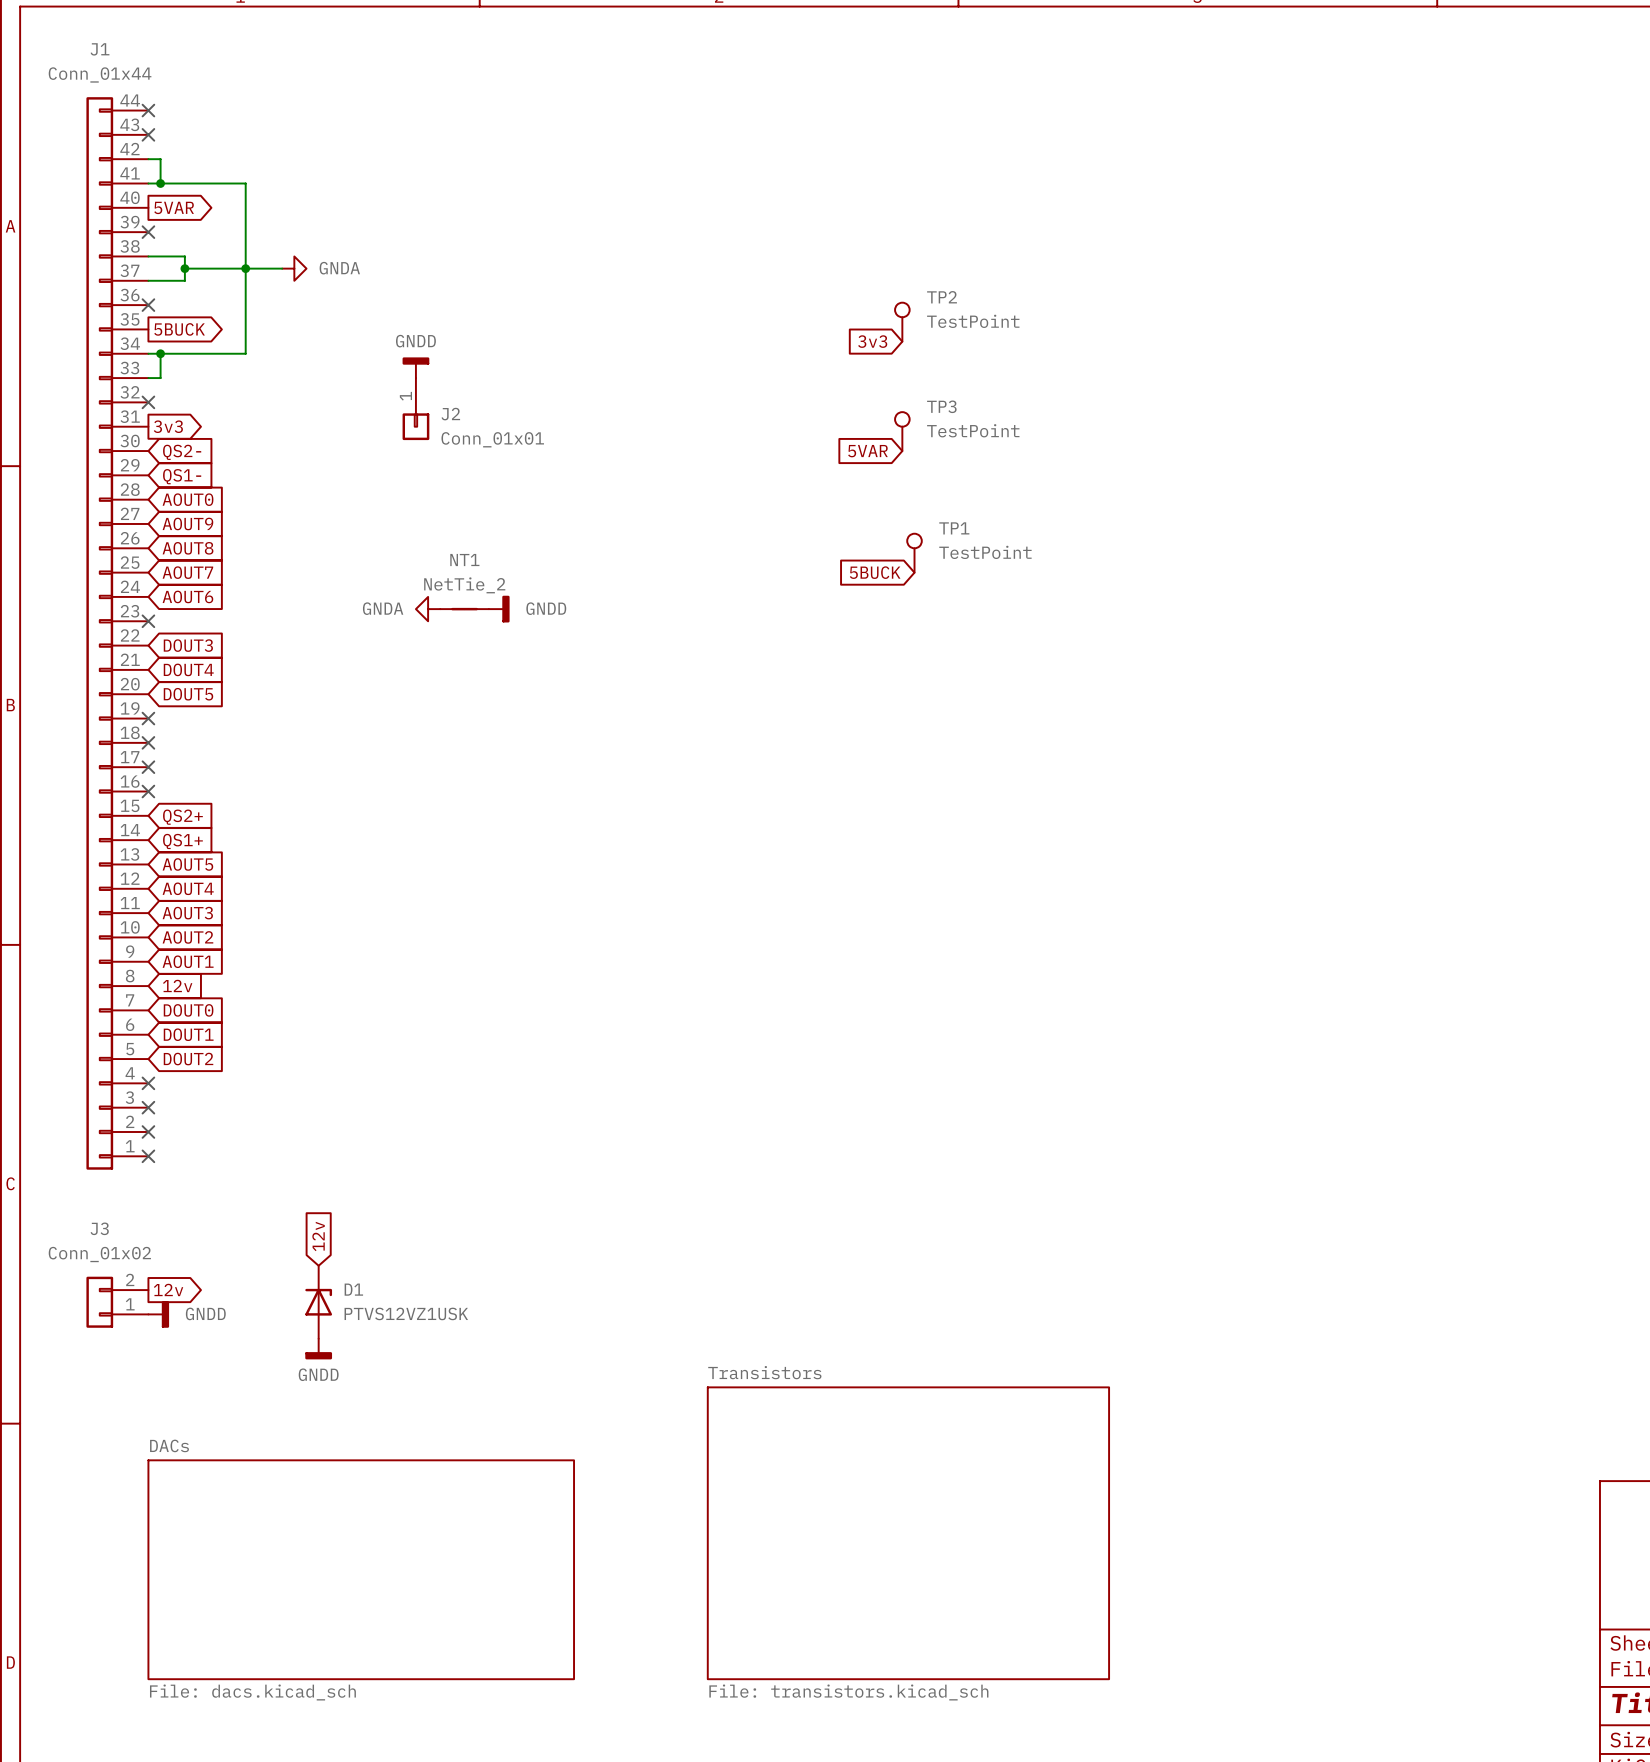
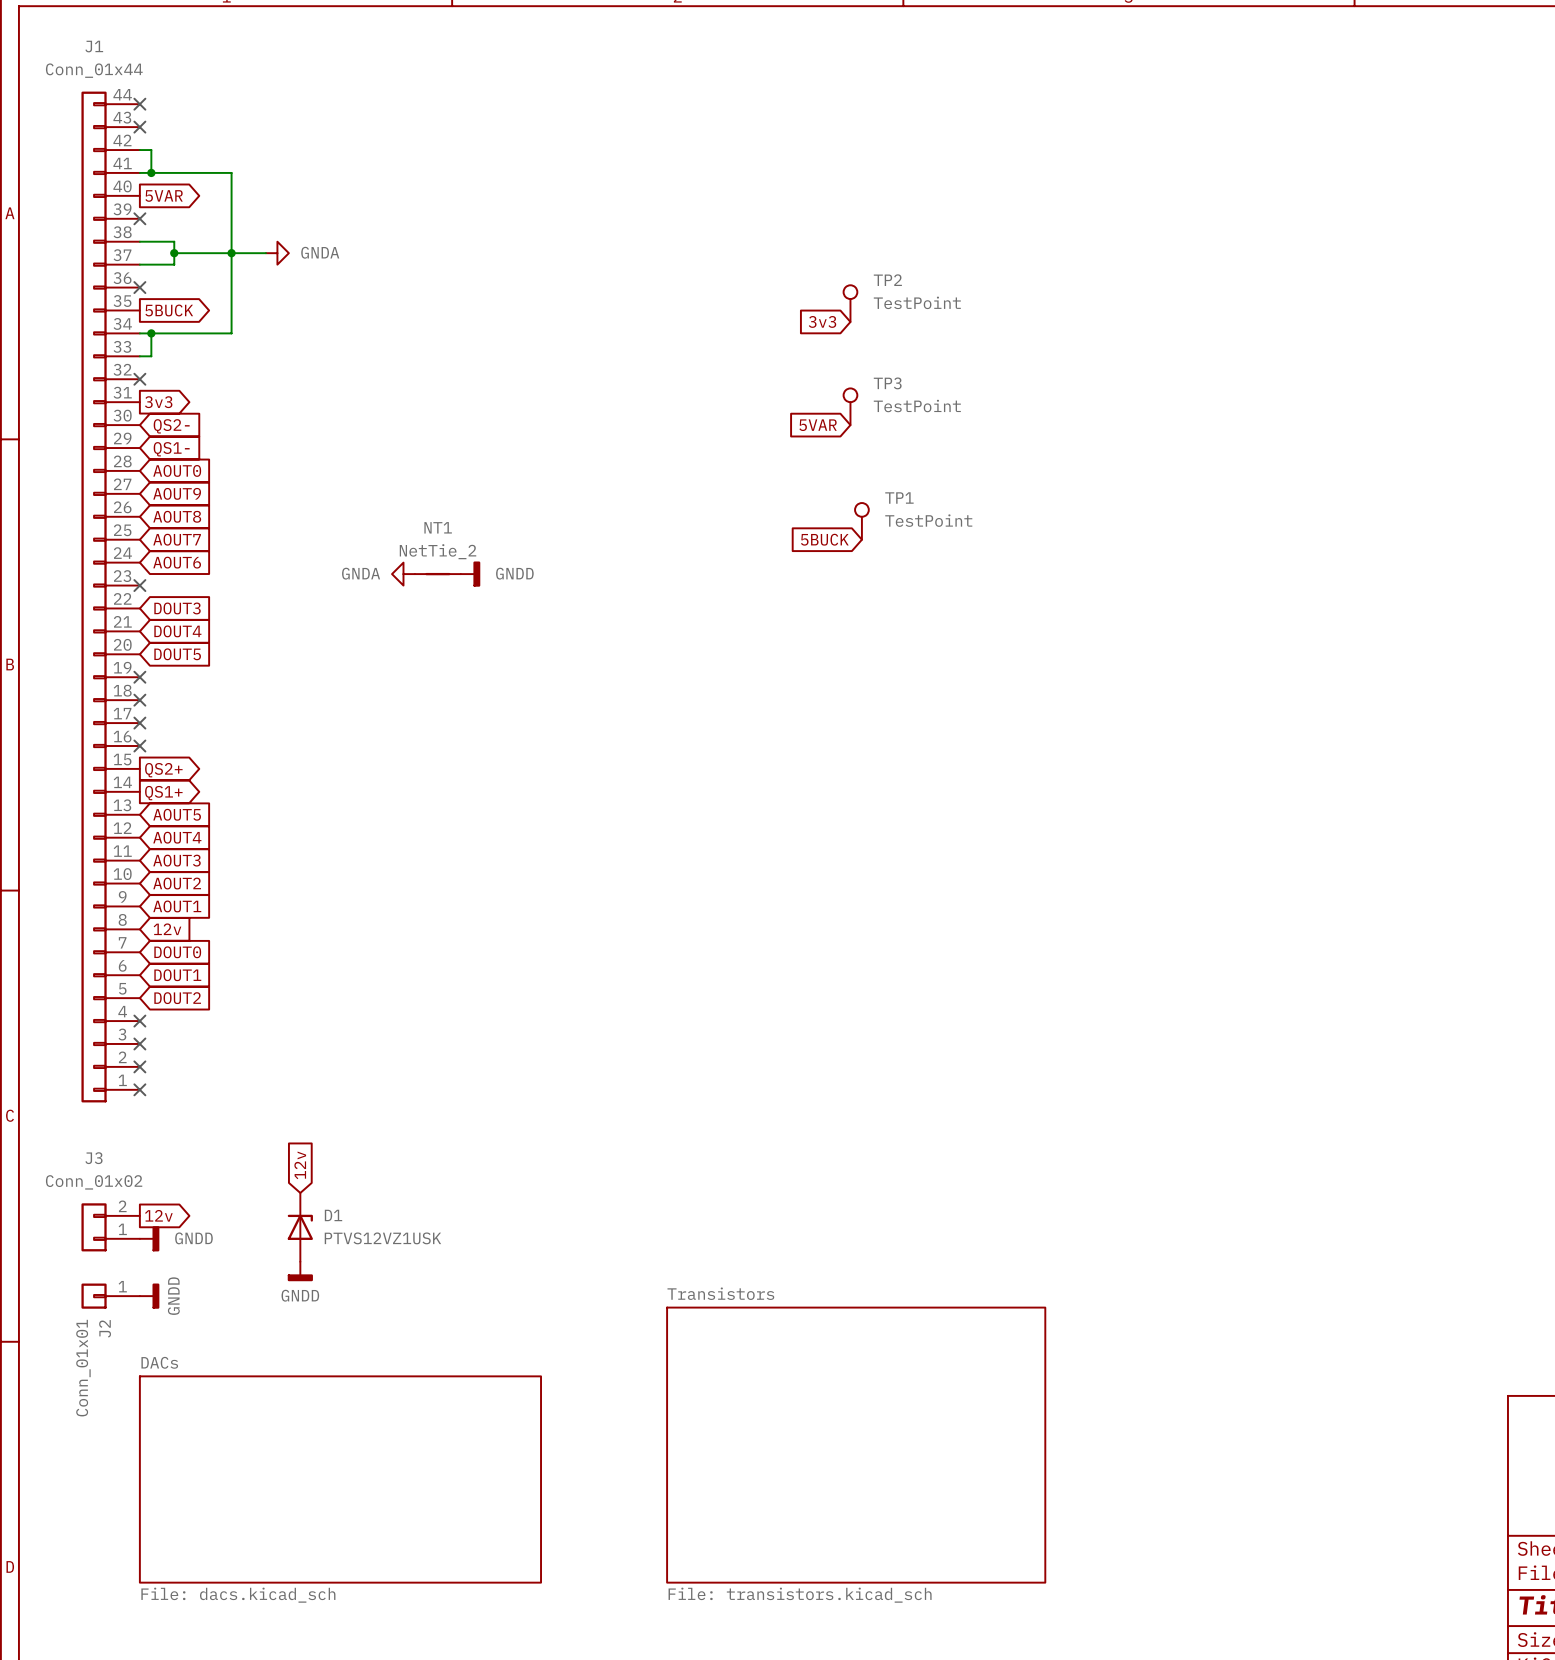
power symbol: GNDD (415, 367) -> none
J2 position: (415, 409) -> (110, 1296)
J2 rotation: 0° (415, 426) -> 90° clockwise (94, 1296)
global label shape: input (182, 817) -> output (163, 770)
global label shape: input (182, 841) -> output (163, 793)
power symbol: none -> GNDD (149, 1296)

